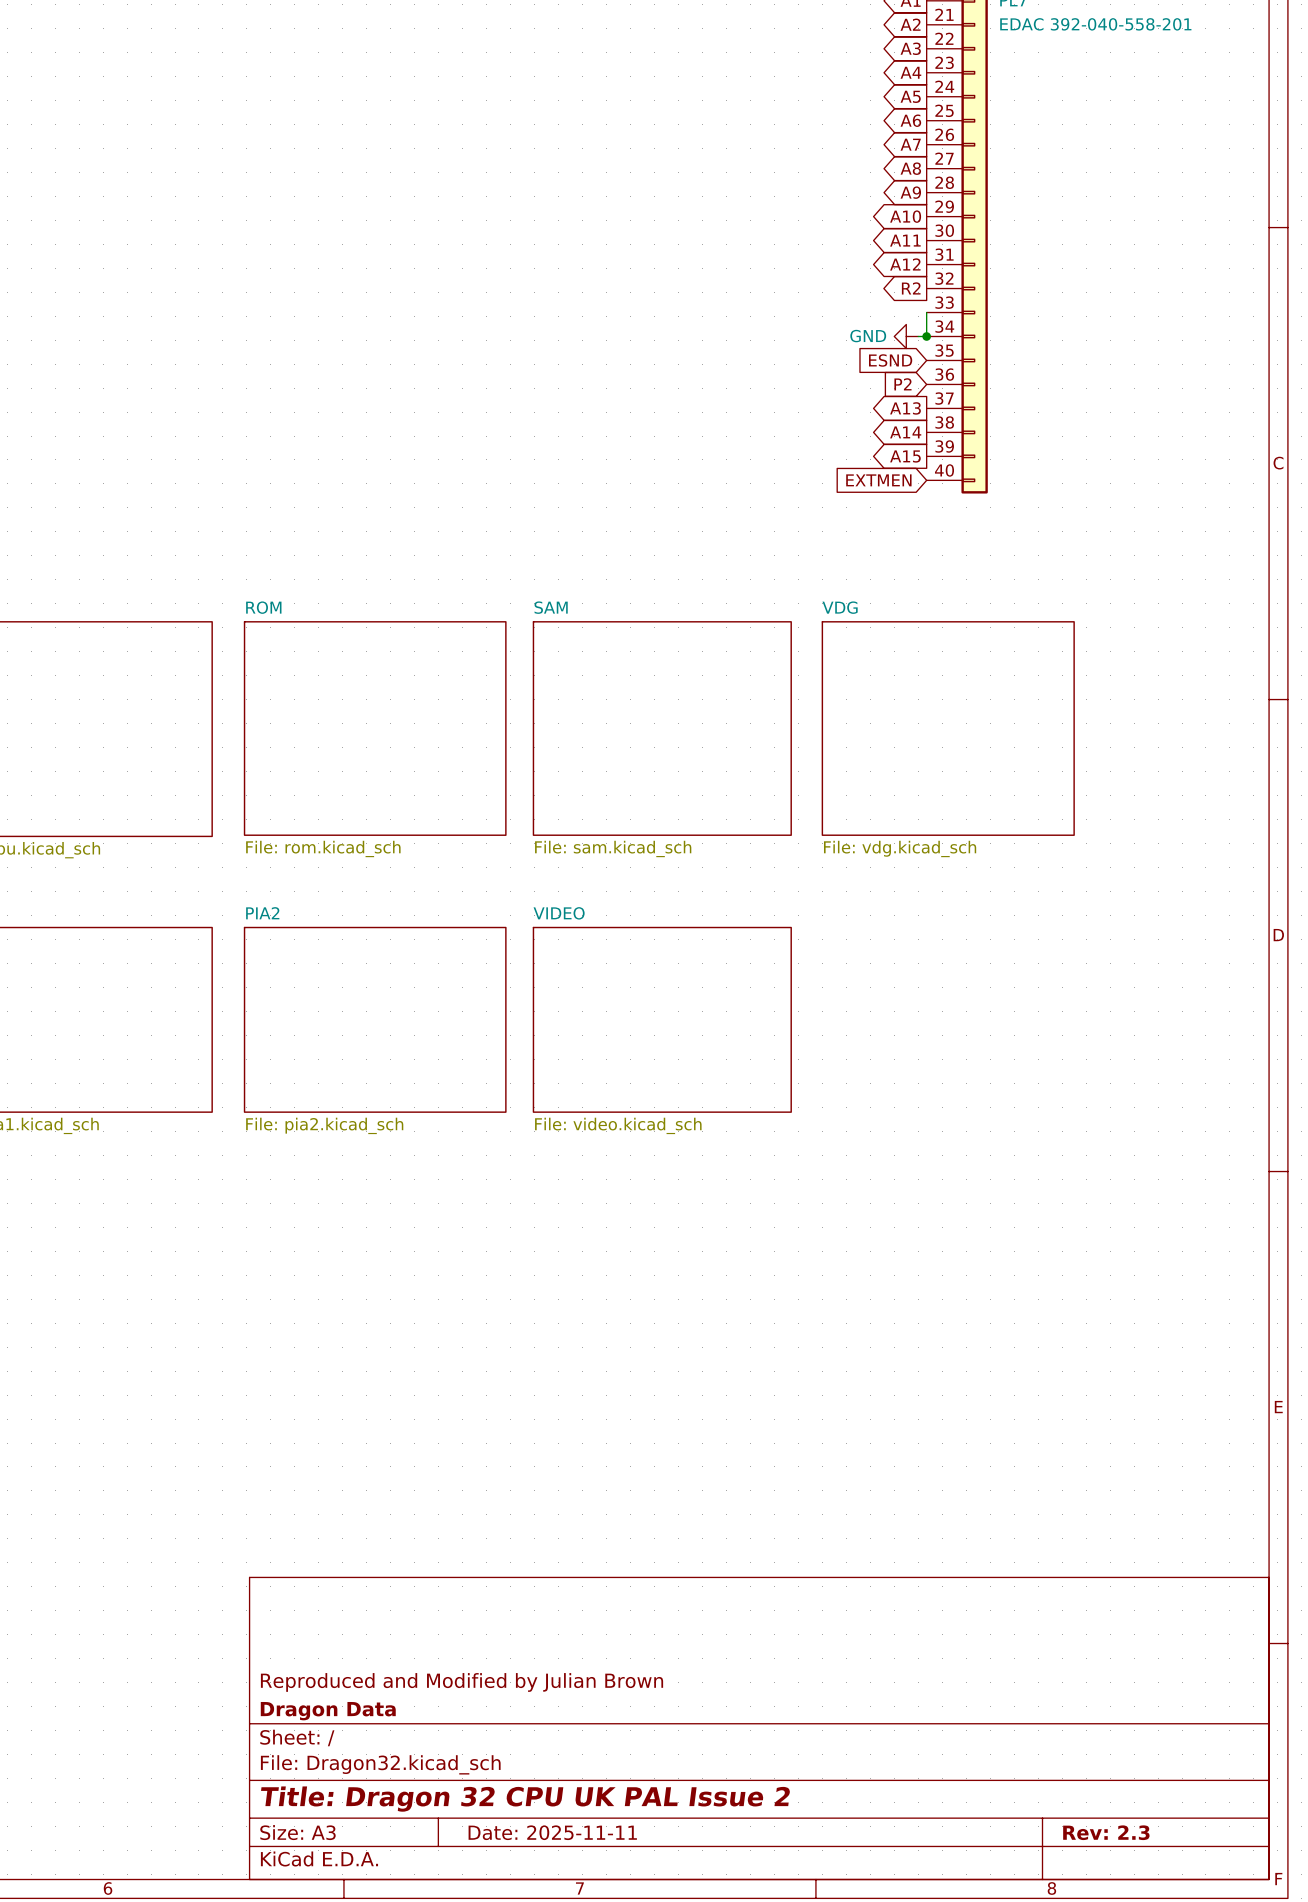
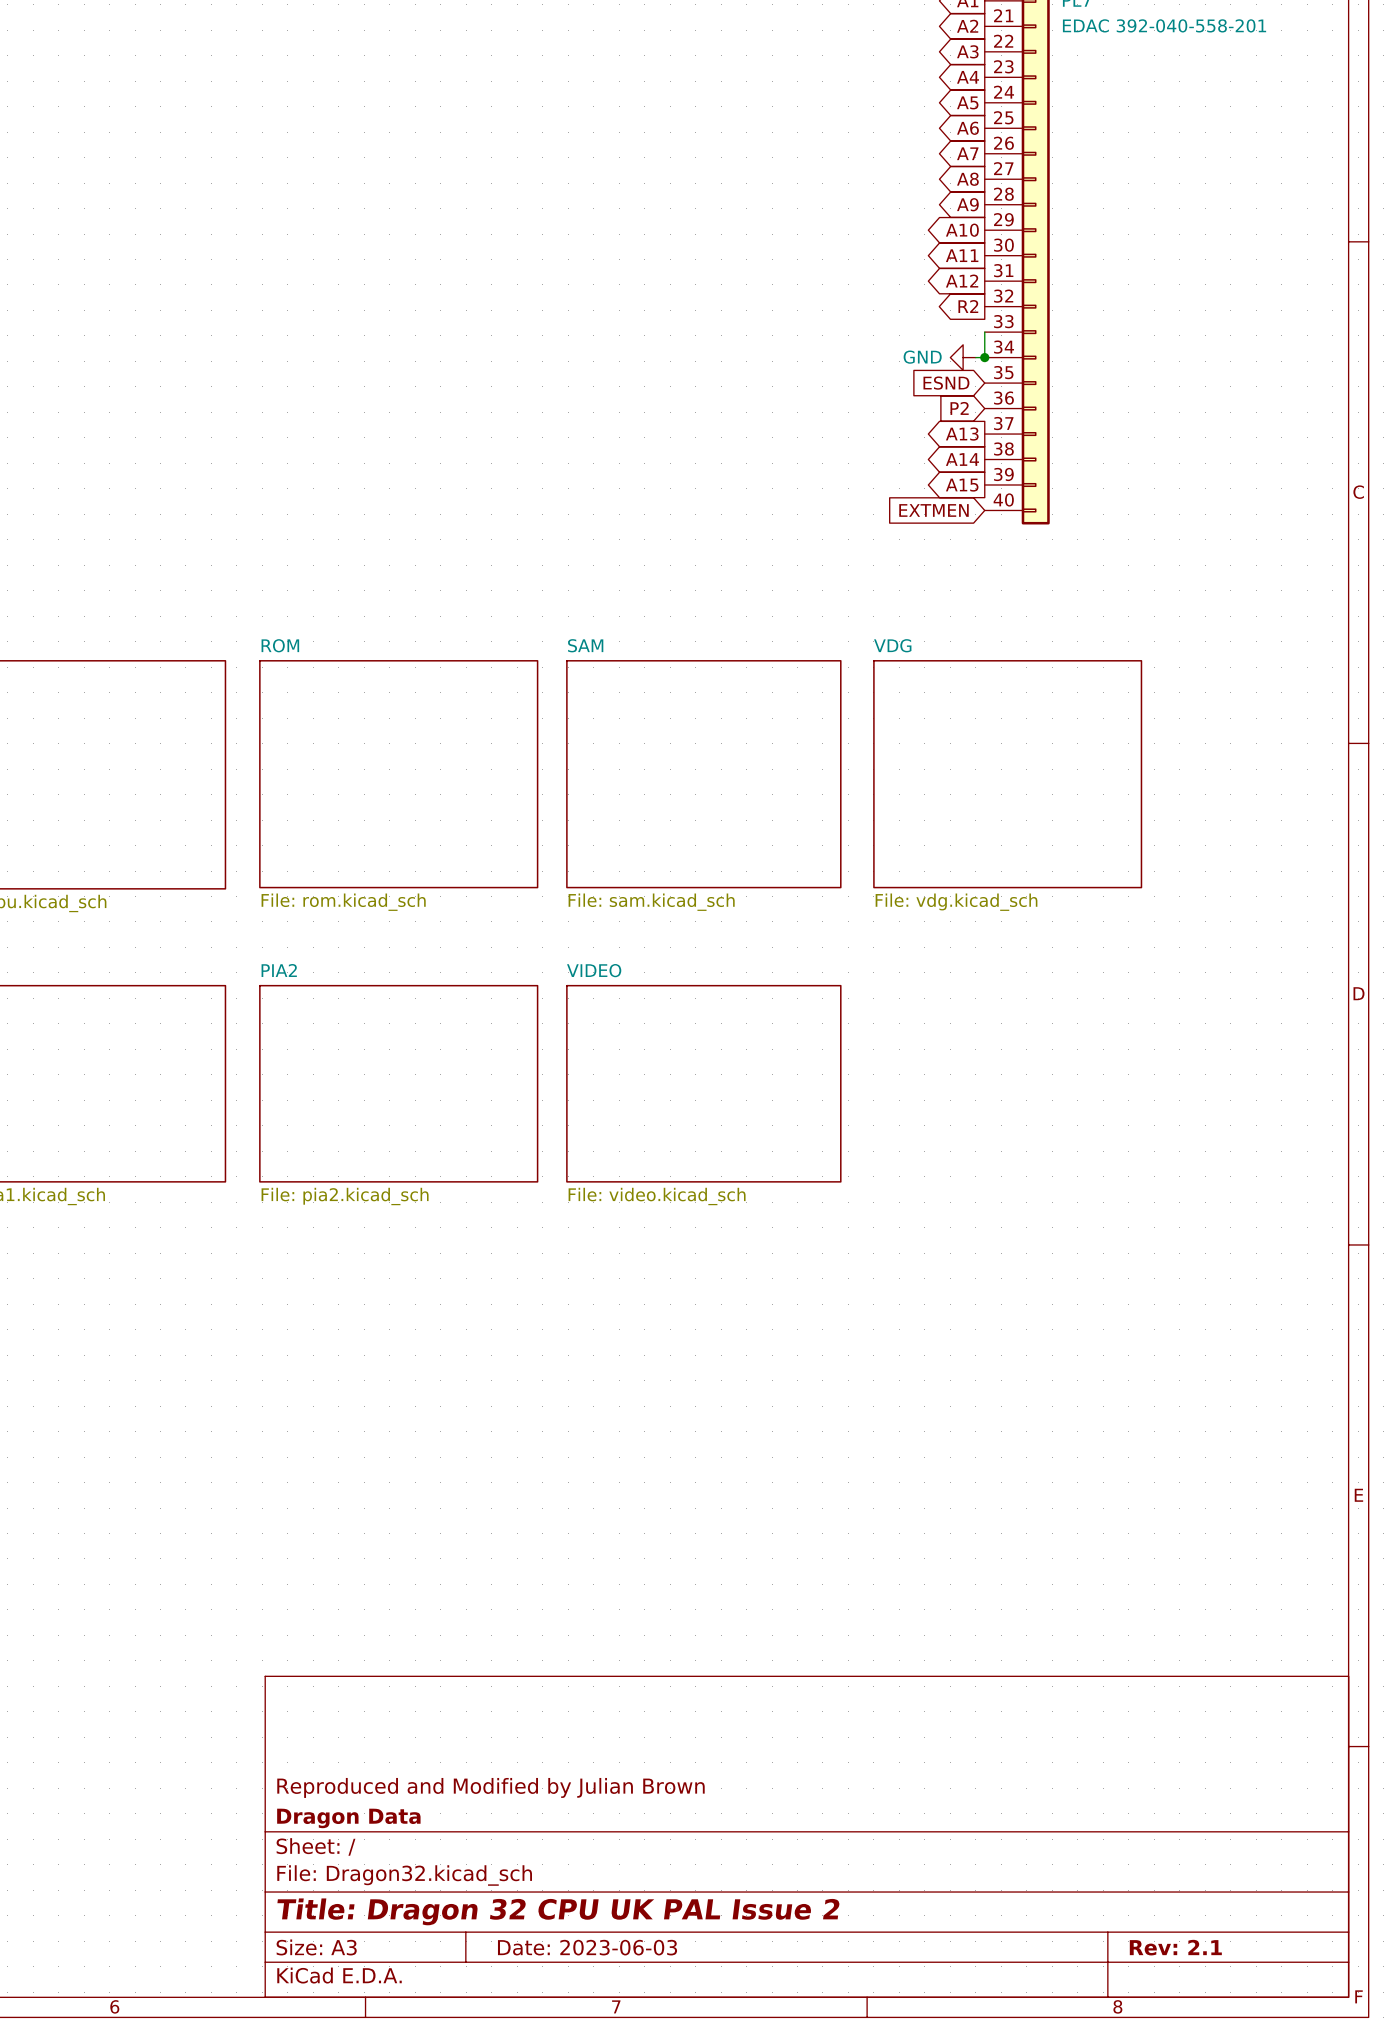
title block: Date: 2025-11-11 (552, 1832) -> Date: 2023-06-03 (587, 1947)
title block: Rev: 2.3 (1106, 1832) -> Rev: 2.1 (1175, 1947)

